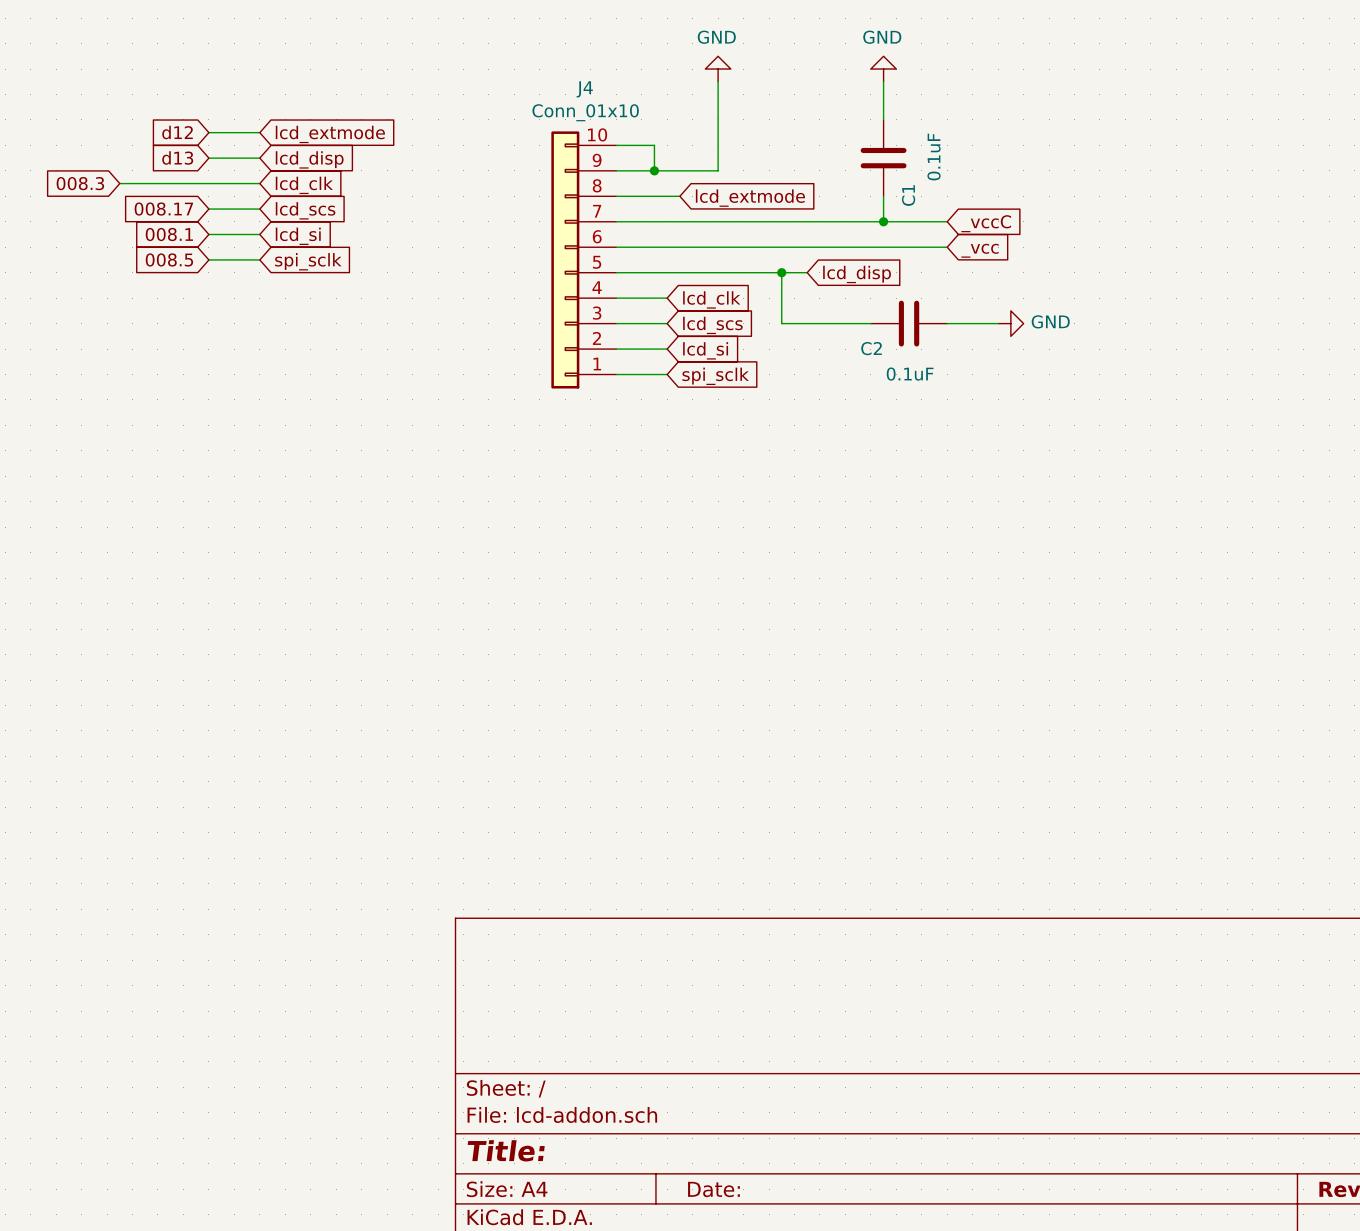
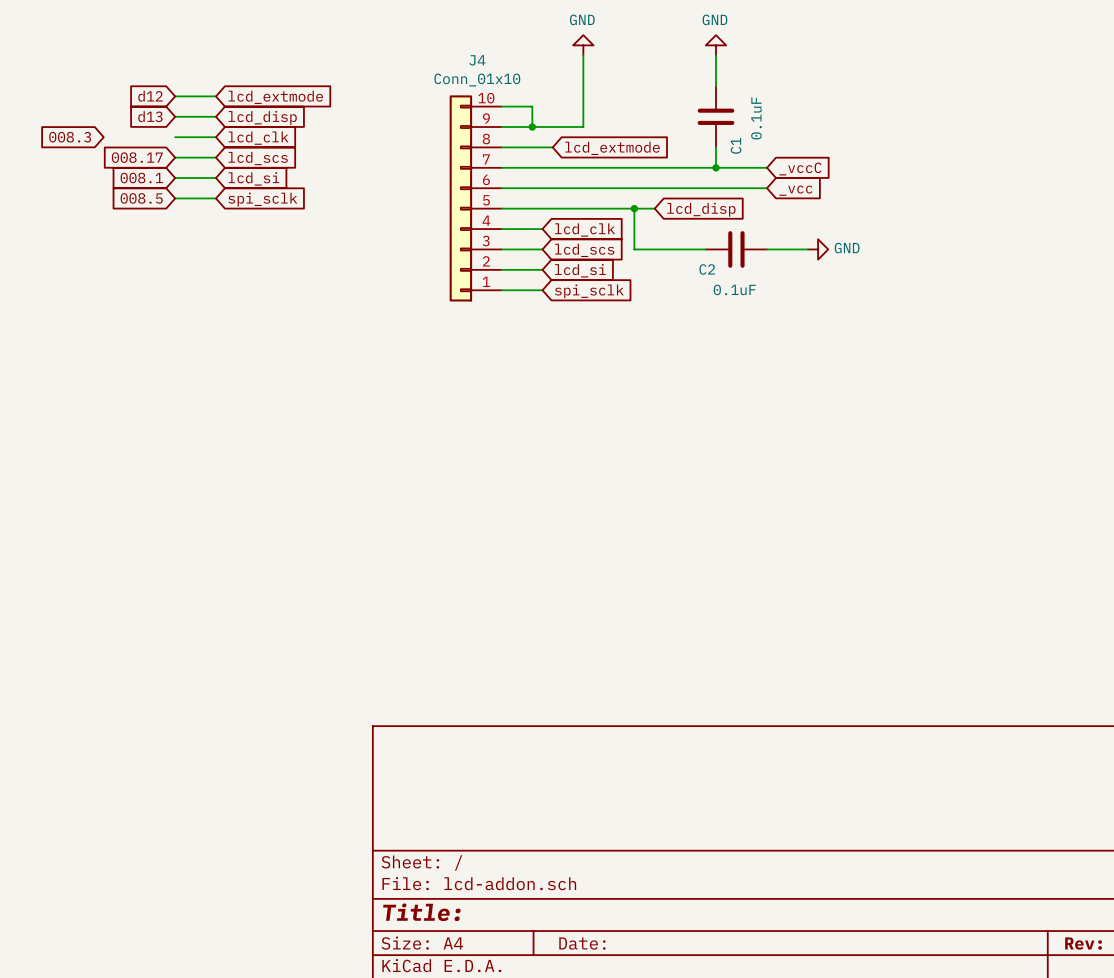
wire: (119, 183) (208, 183) -> none

